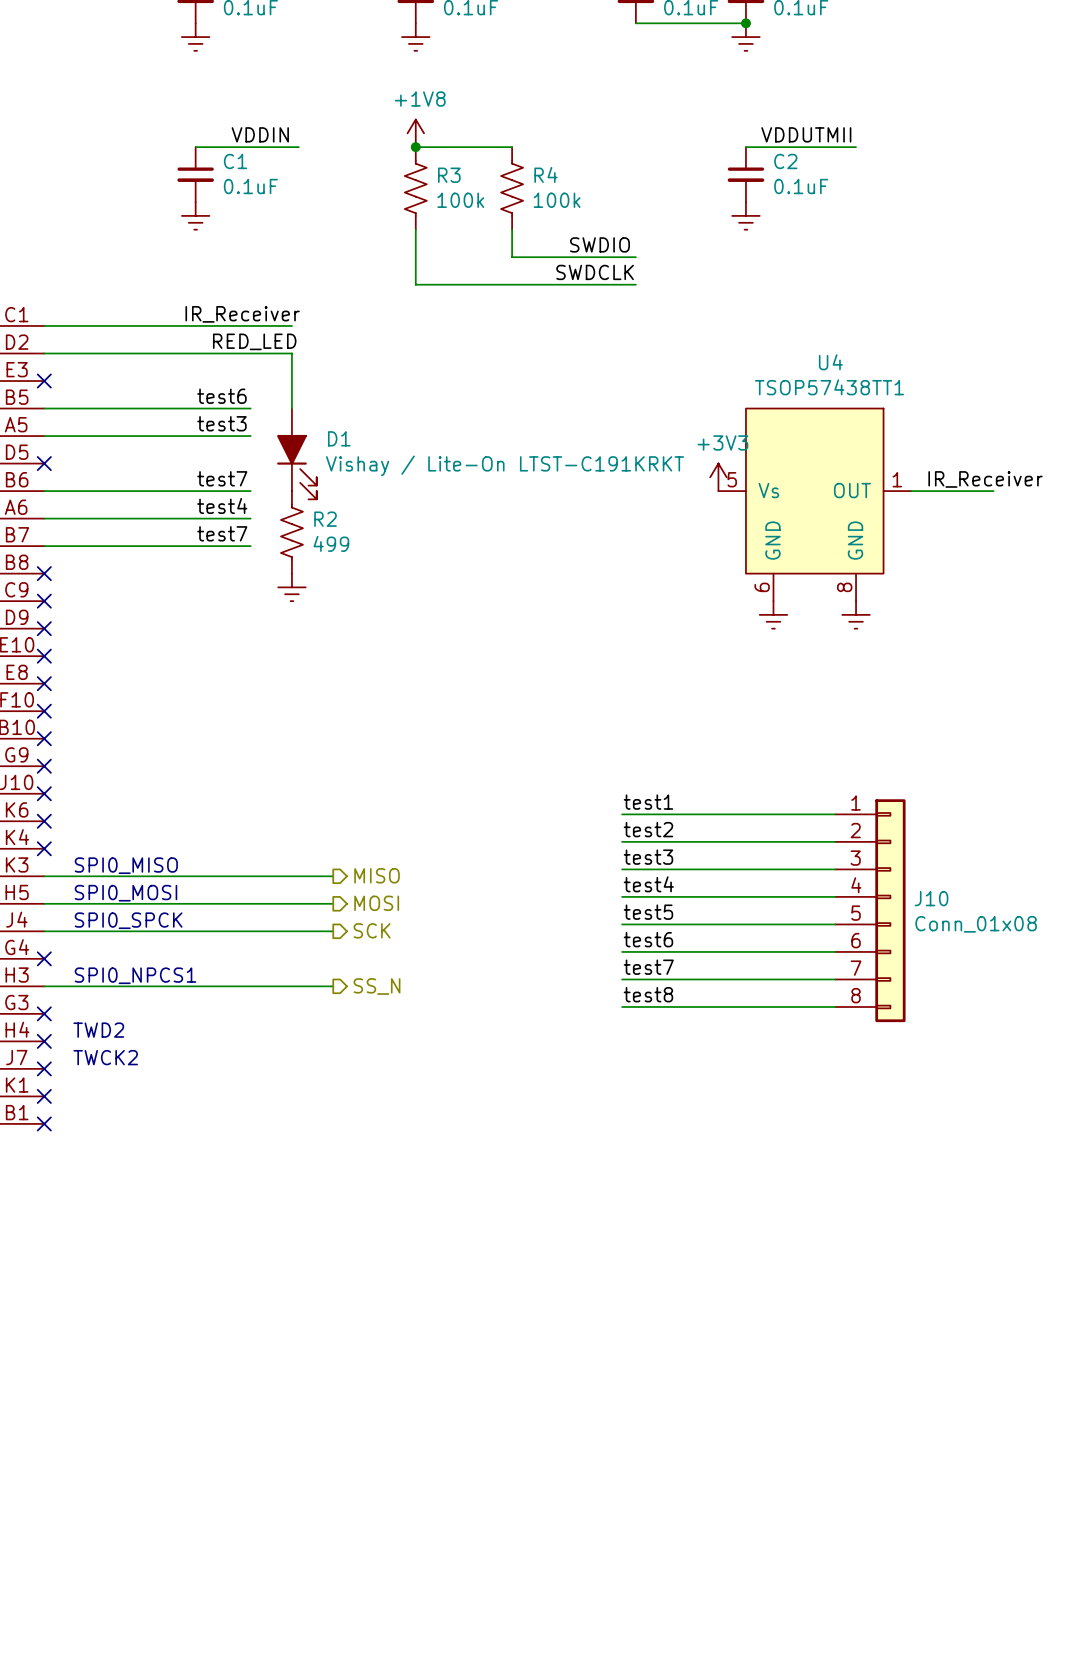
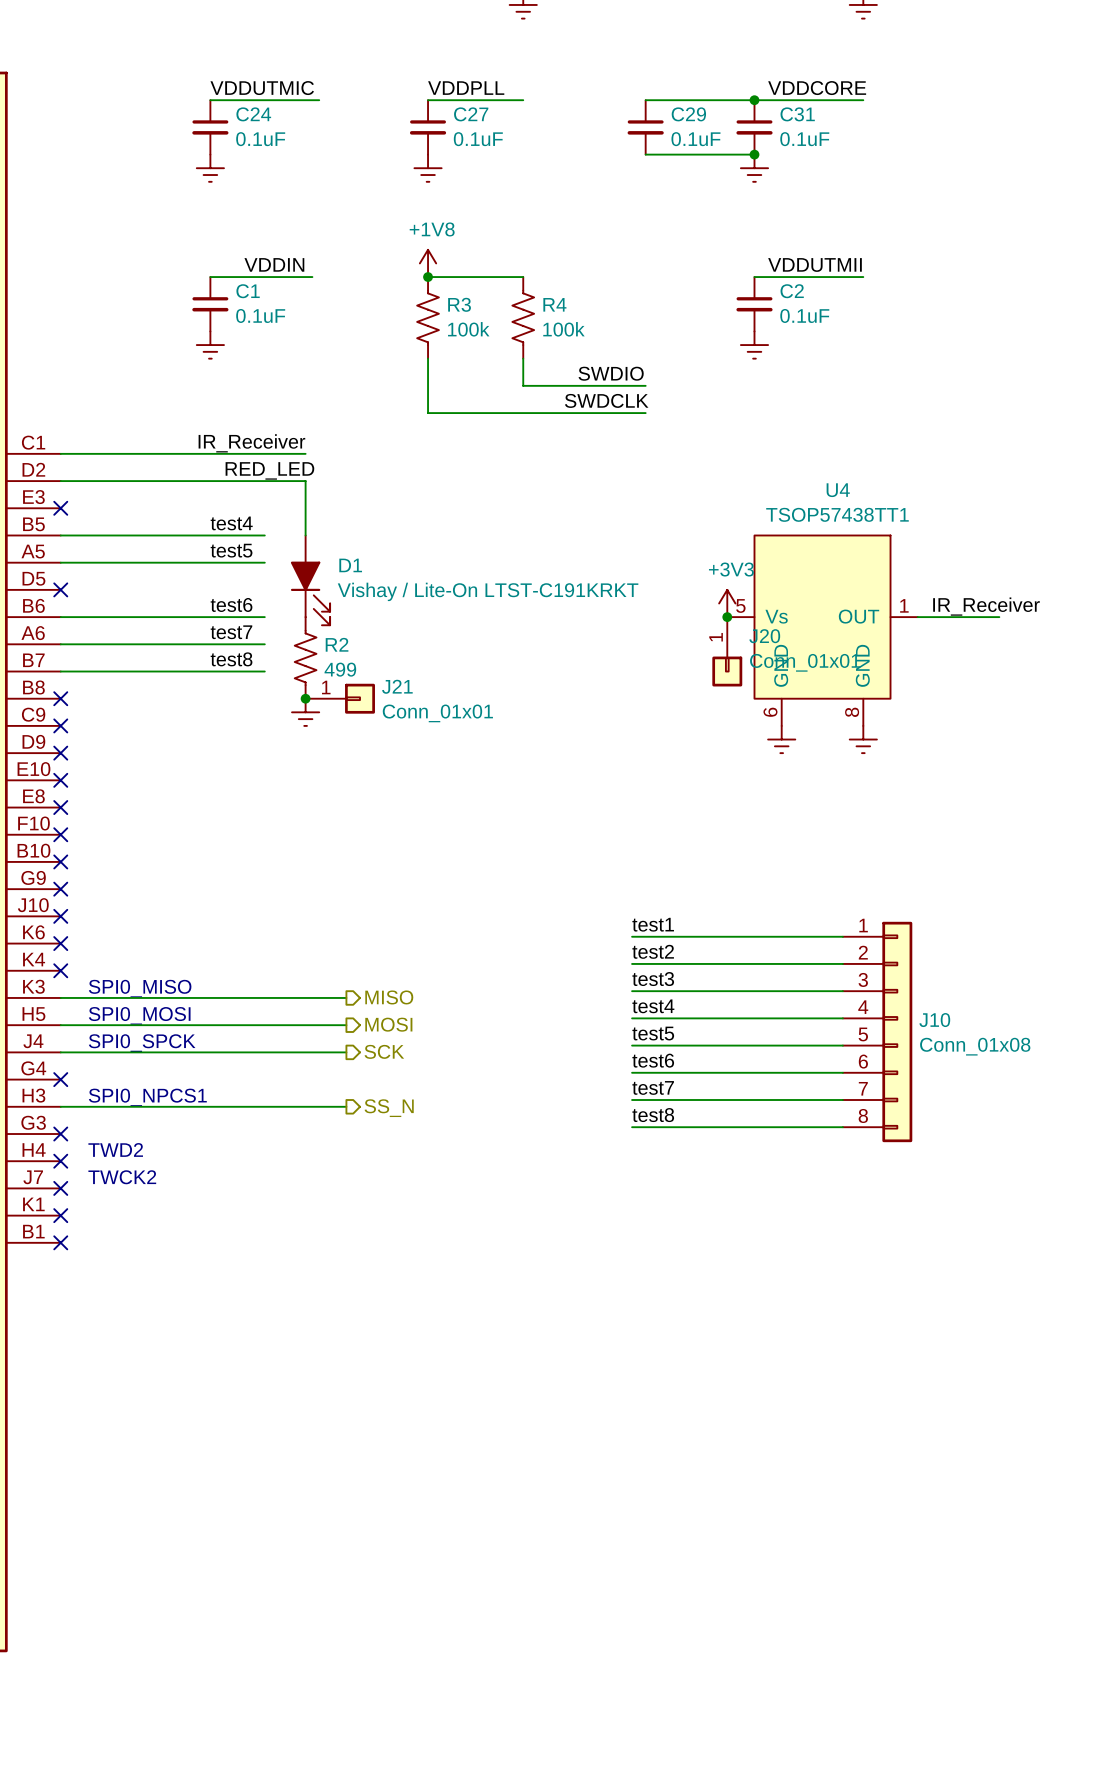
label: test6 (221, 396) -> test4 (231, 523)
label: test3 (221, 423) -> test5 (231, 550)
label: test7 (222, 478) -> test6 (231, 604)
junction: none -> (727, 617)
label: test4 (222, 505) -> test7 (231, 632)
J20: none -> Conn_01x01 (727, 651)
label: test7 (222, 533) -> test8 (231, 659)
junction: none -> (305, 698)
J21: none -> Conn_01x01 (340, 698)

